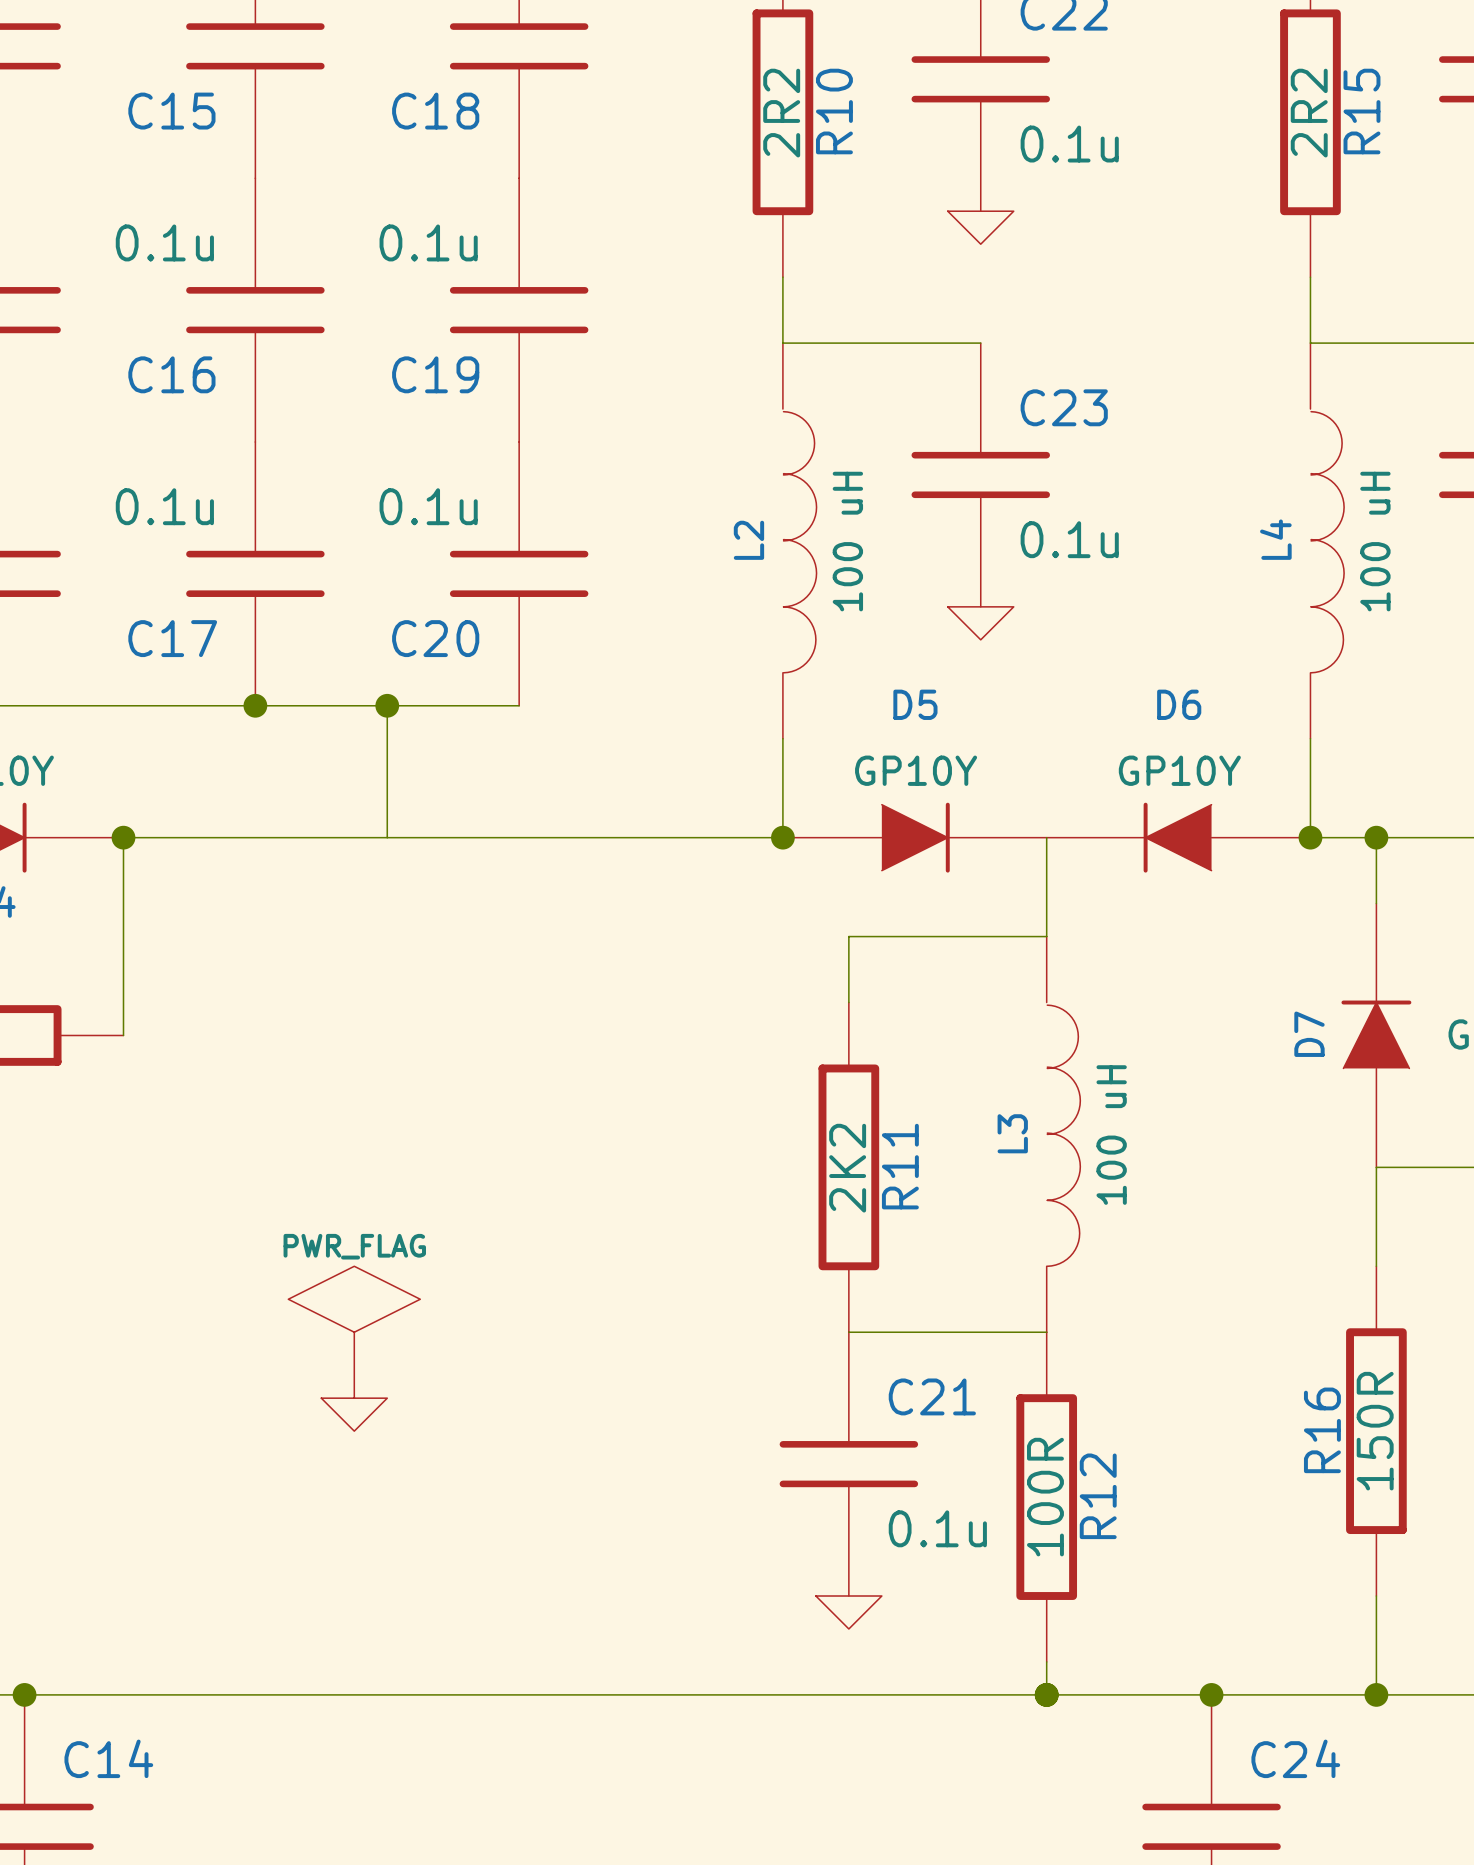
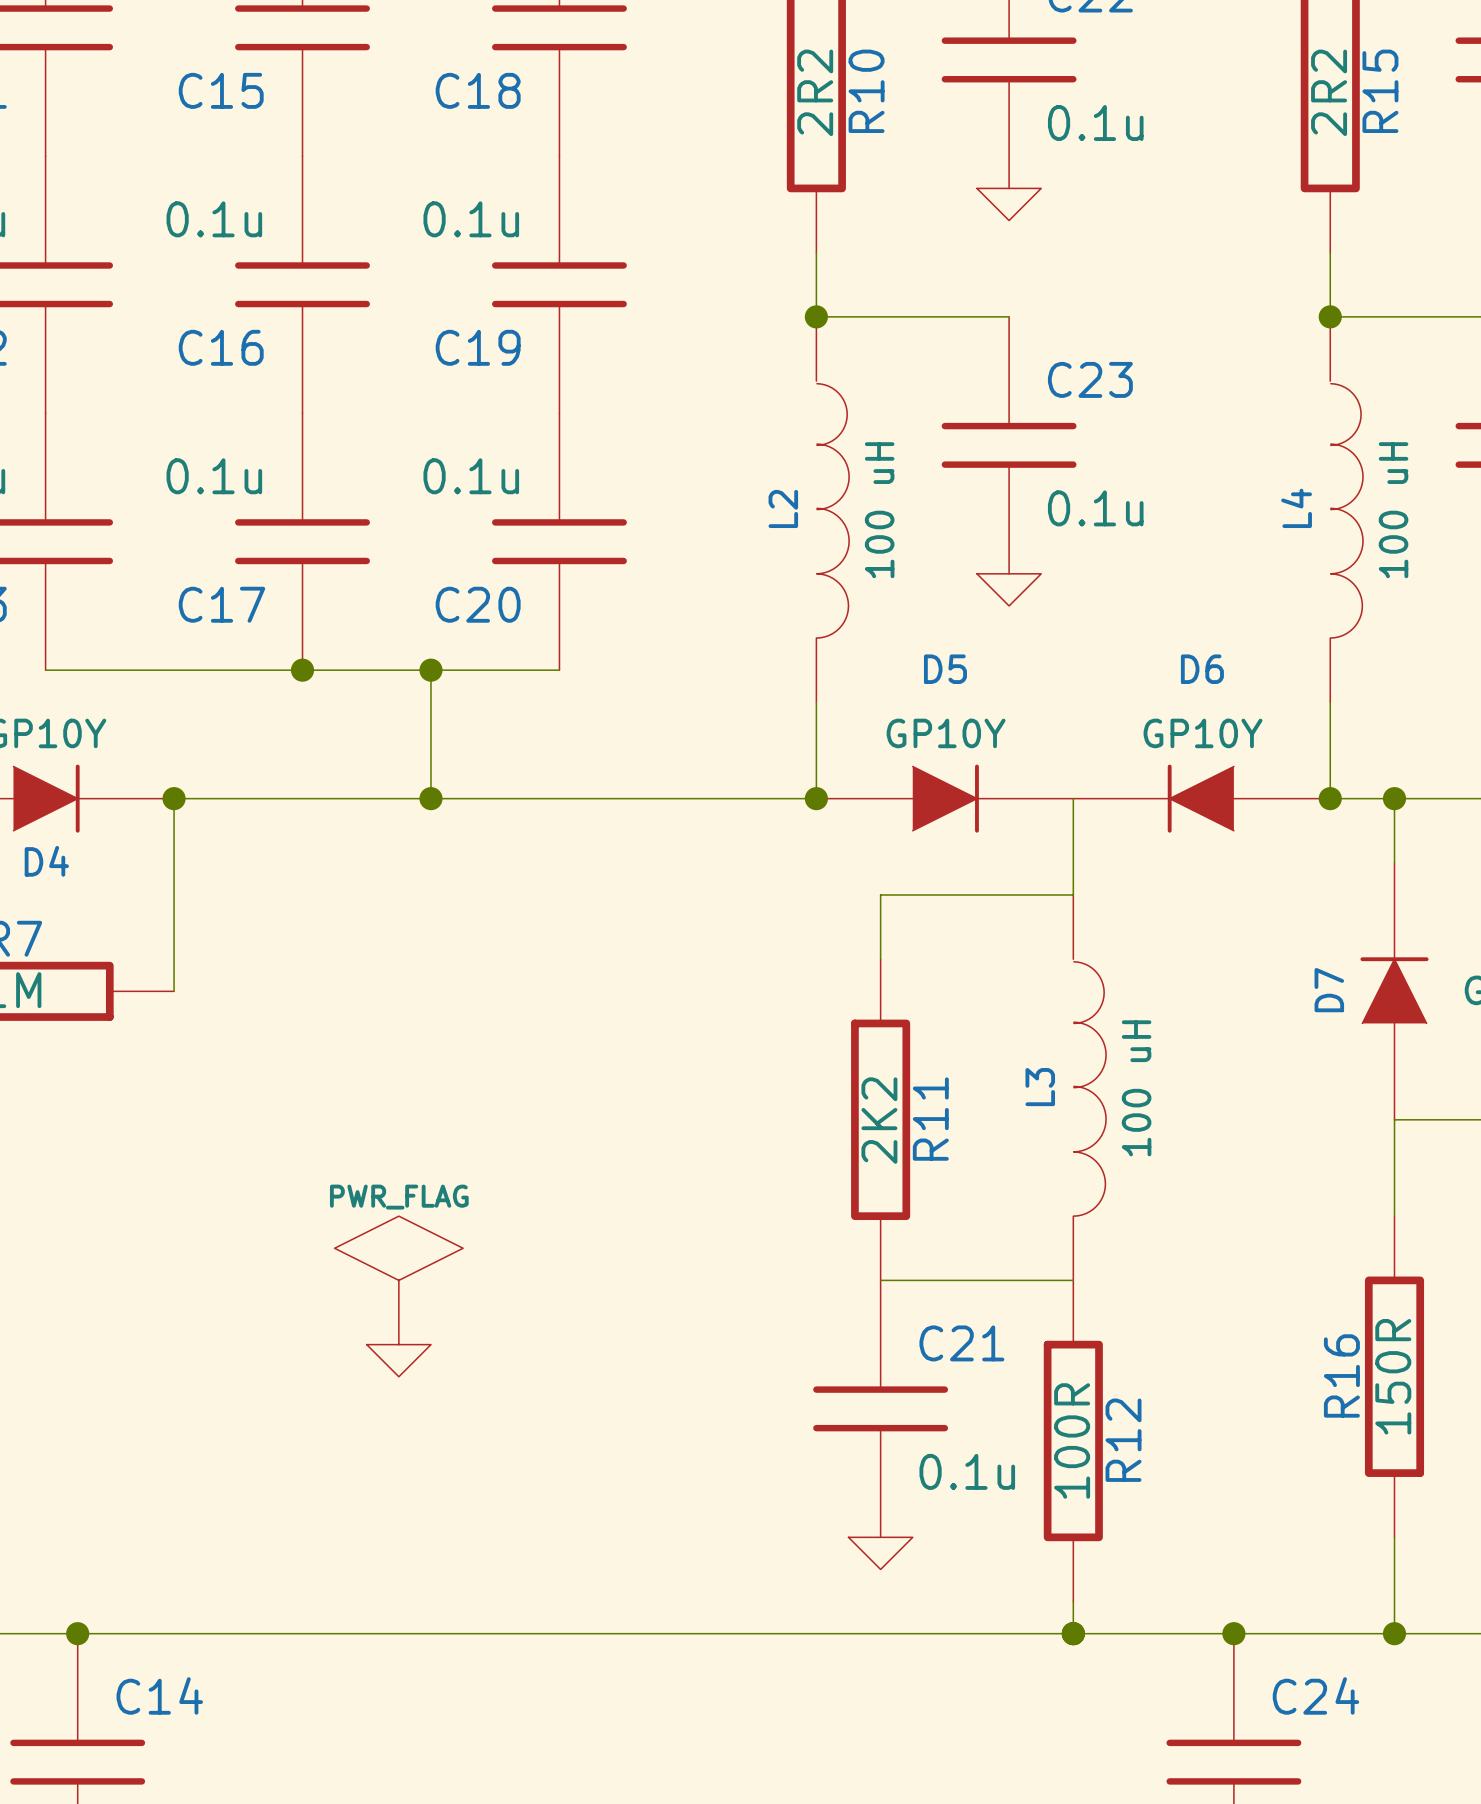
junction: none -> (816, 316)
junction: none -> (1330, 316)
junction: none -> (430, 798)

